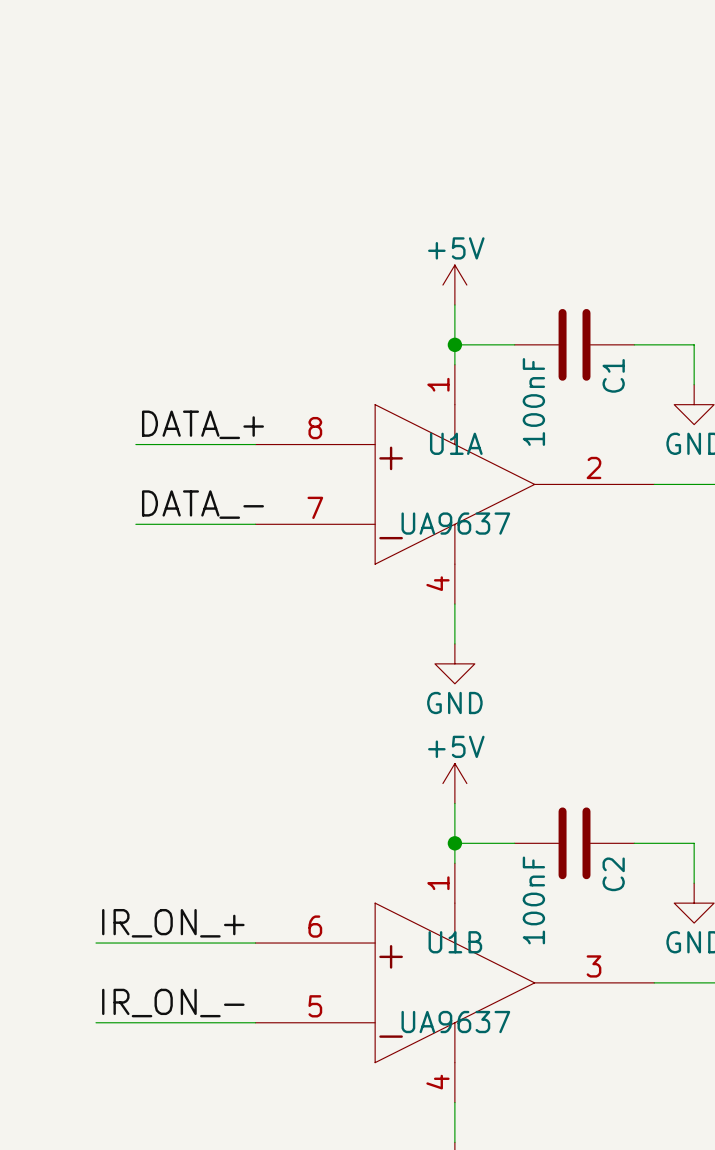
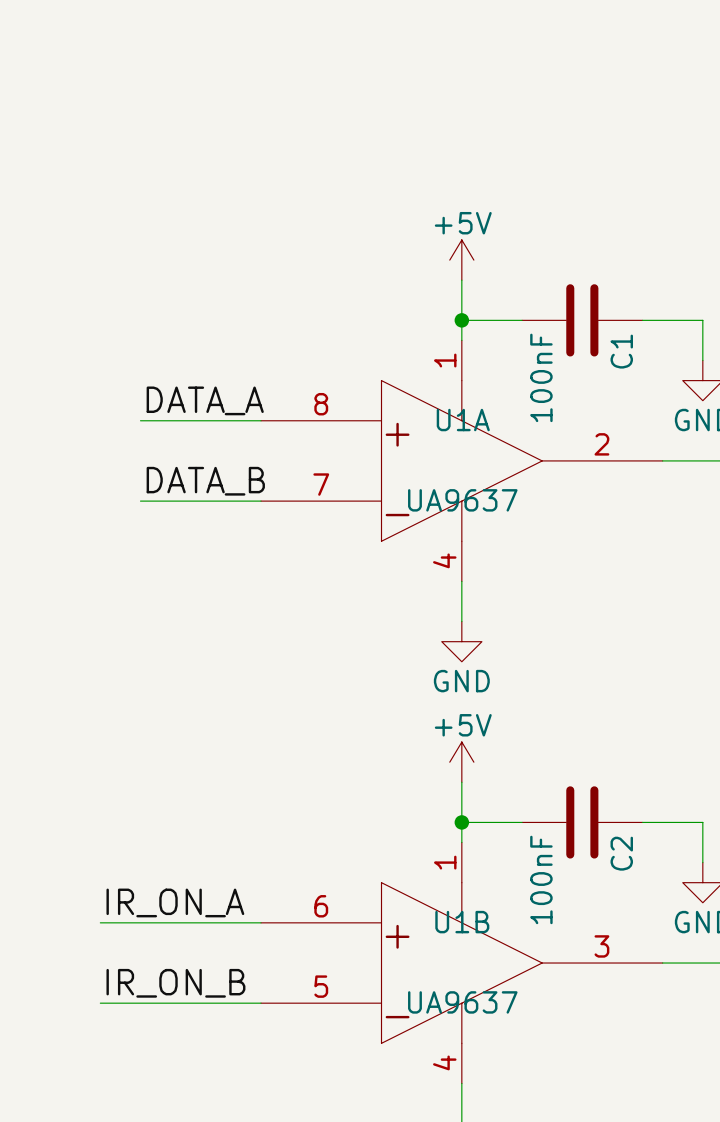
label: DATA_+ (202, 424) -> DATA_A (205, 400)
label: DATA_- (202, 504) -> DATA_B (205, 481)
label: IR_ON_+ (173, 923) -> IR_ON_A (175, 902)
label: IR_ON_- (173, 1003) -> IR_ON_B (175, 983)

